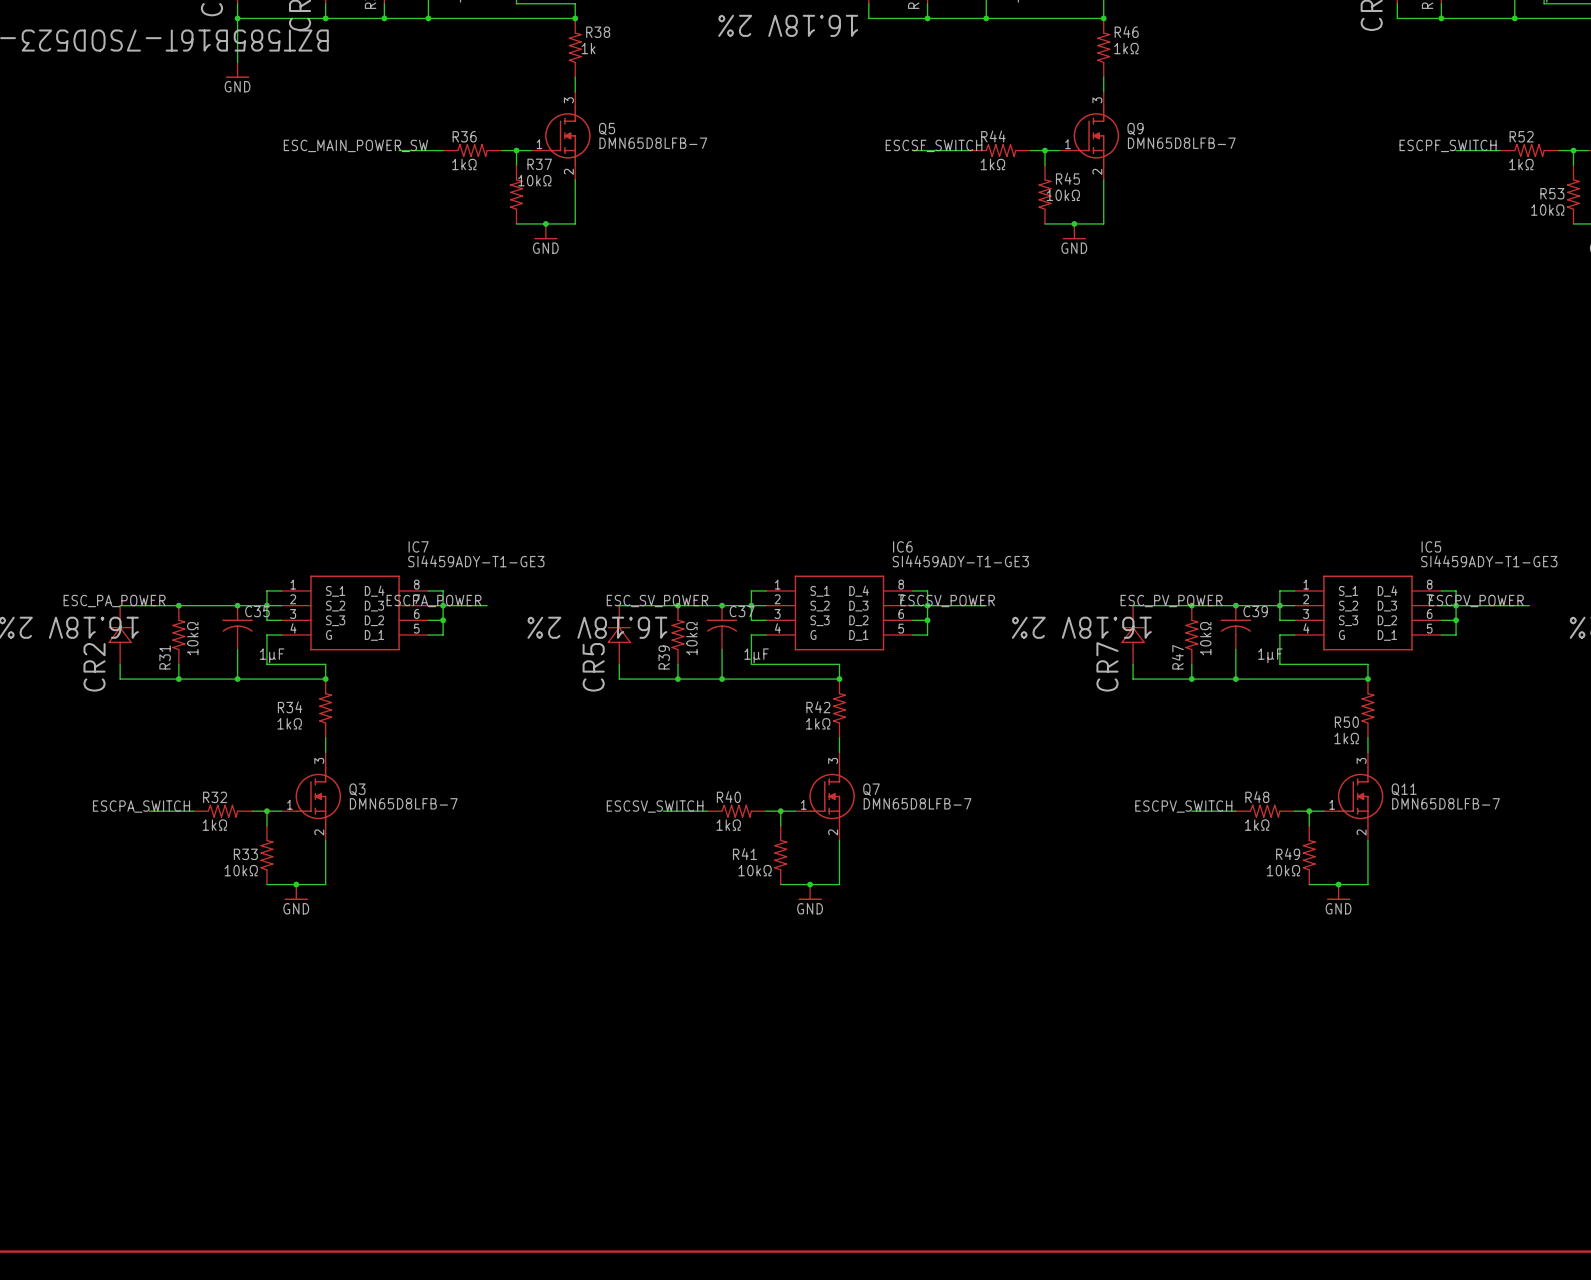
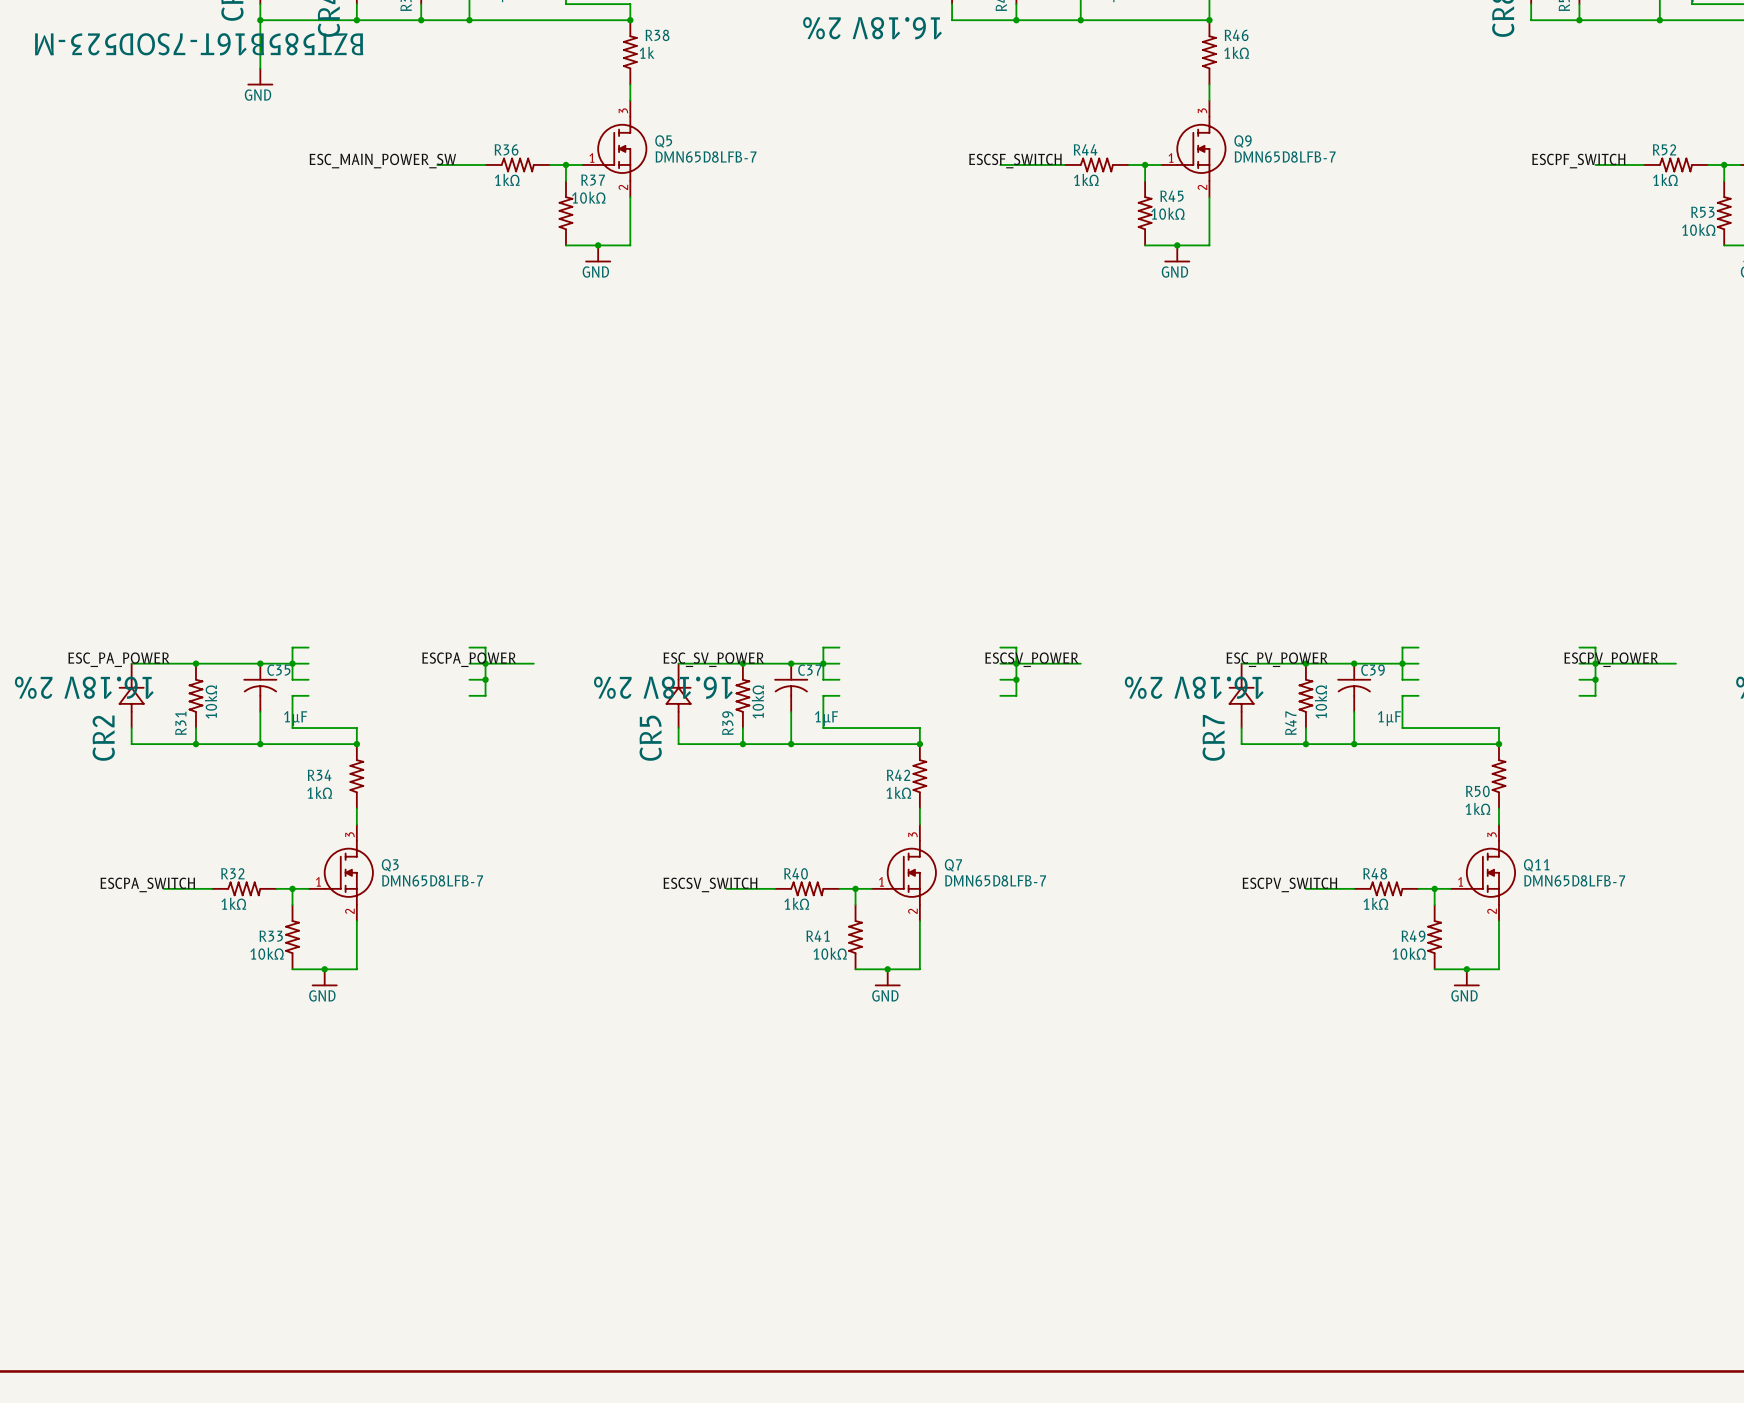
IC7: SI4459ADY-T1-GE3 (355, 612) -> none
IC6: SI4459ADY-T1-GE3 (839, 612) -> none
IC5: SI4459ADY-T1-GE3 (1367, 612) -> none

